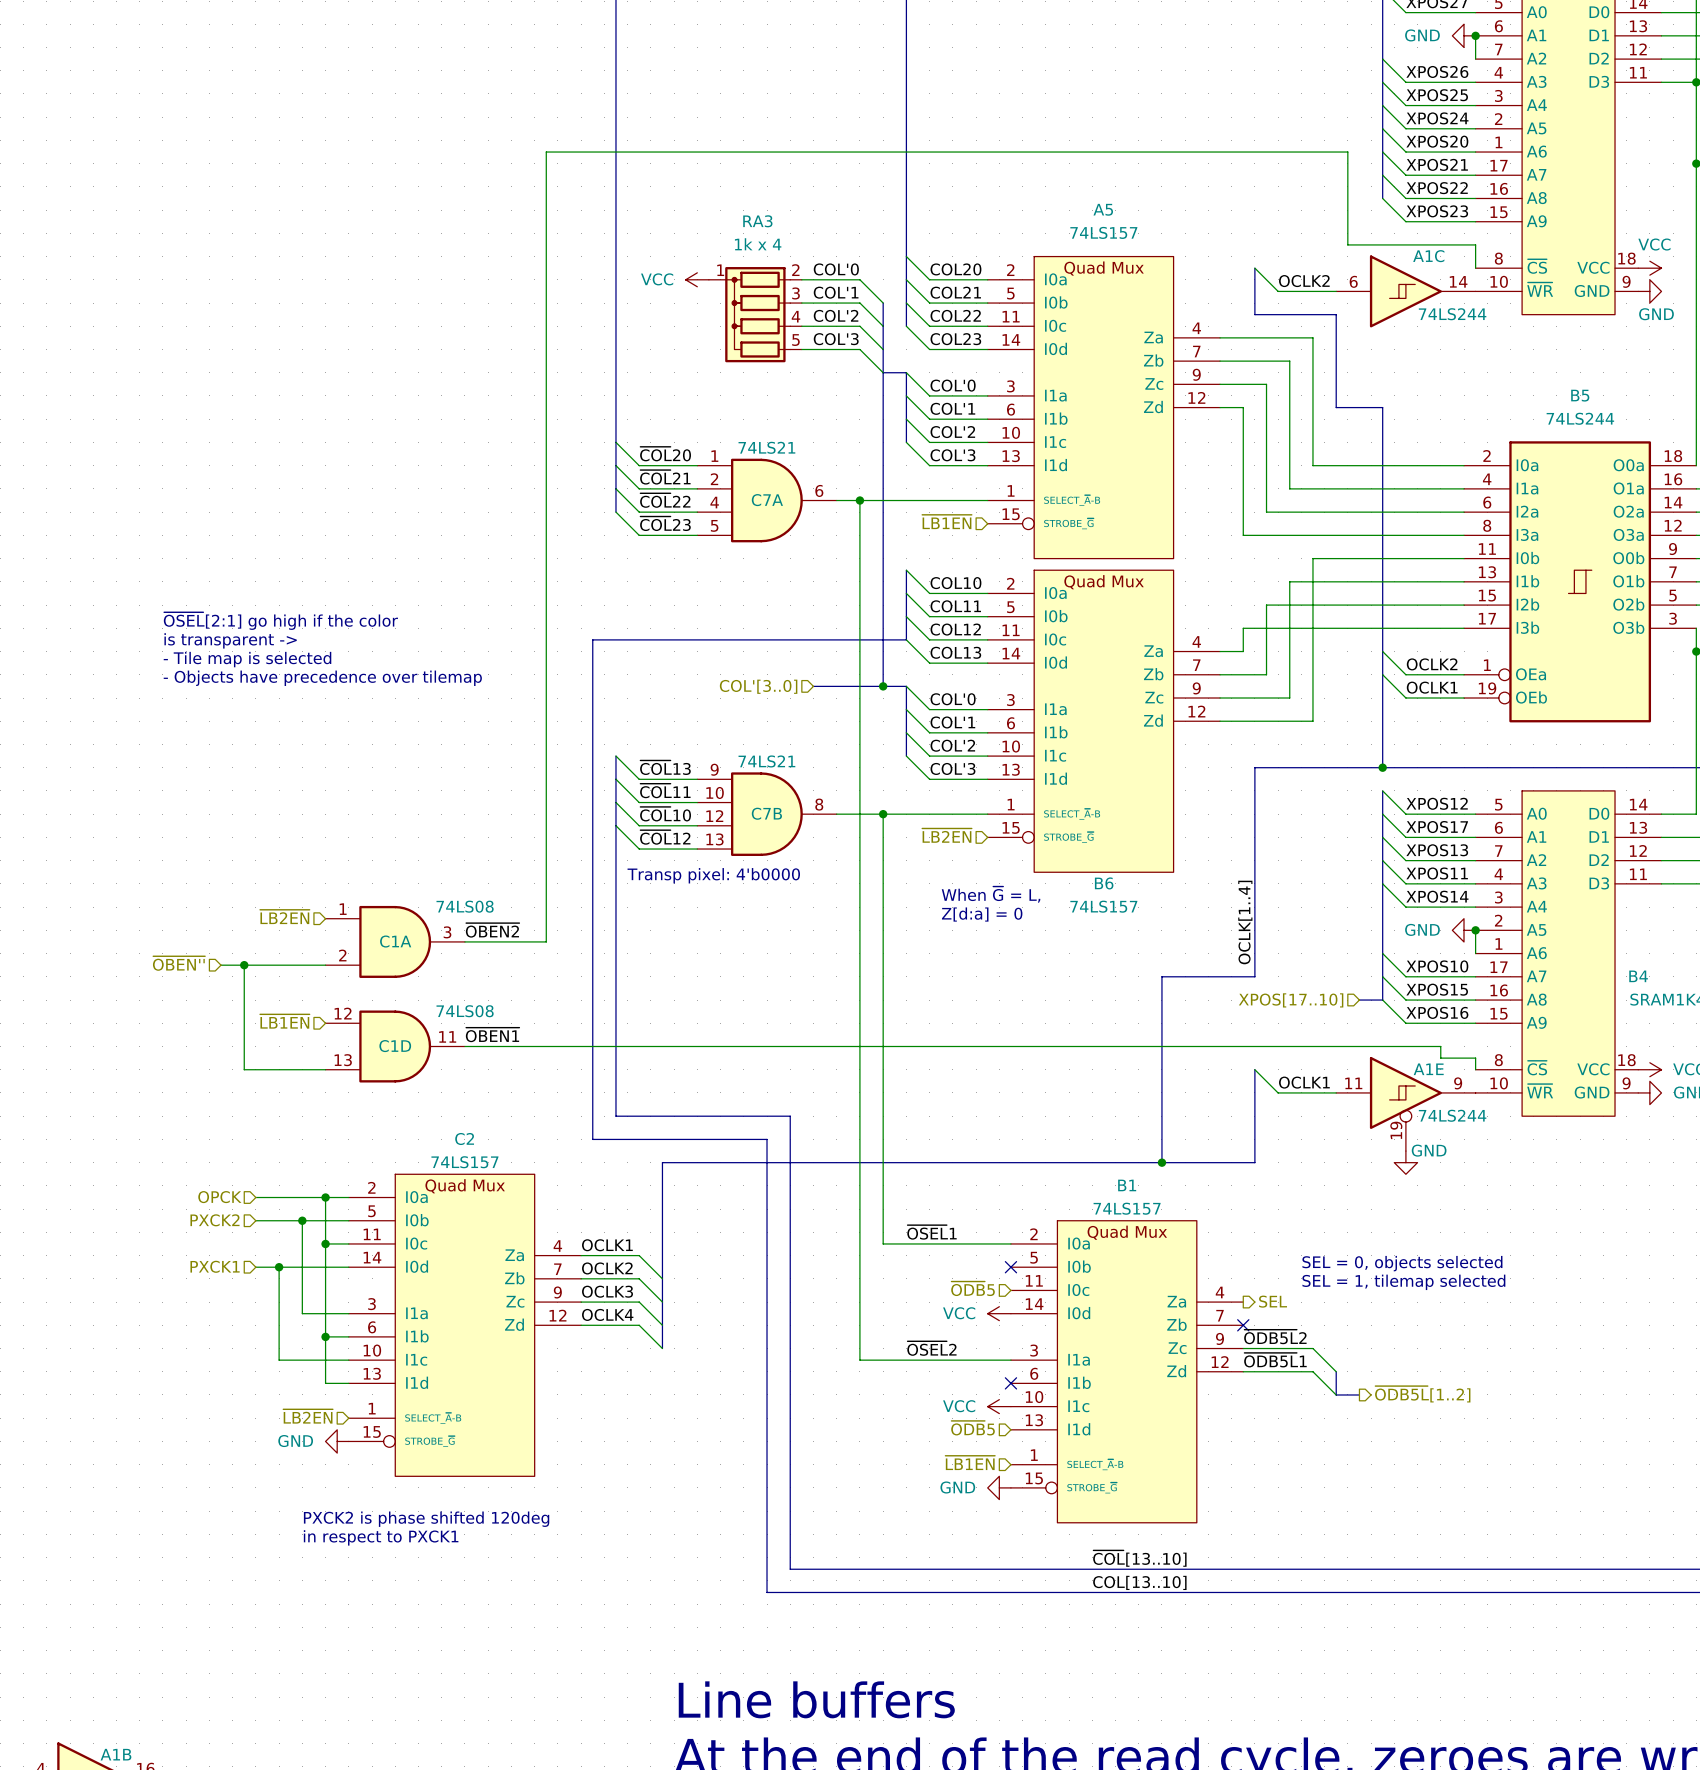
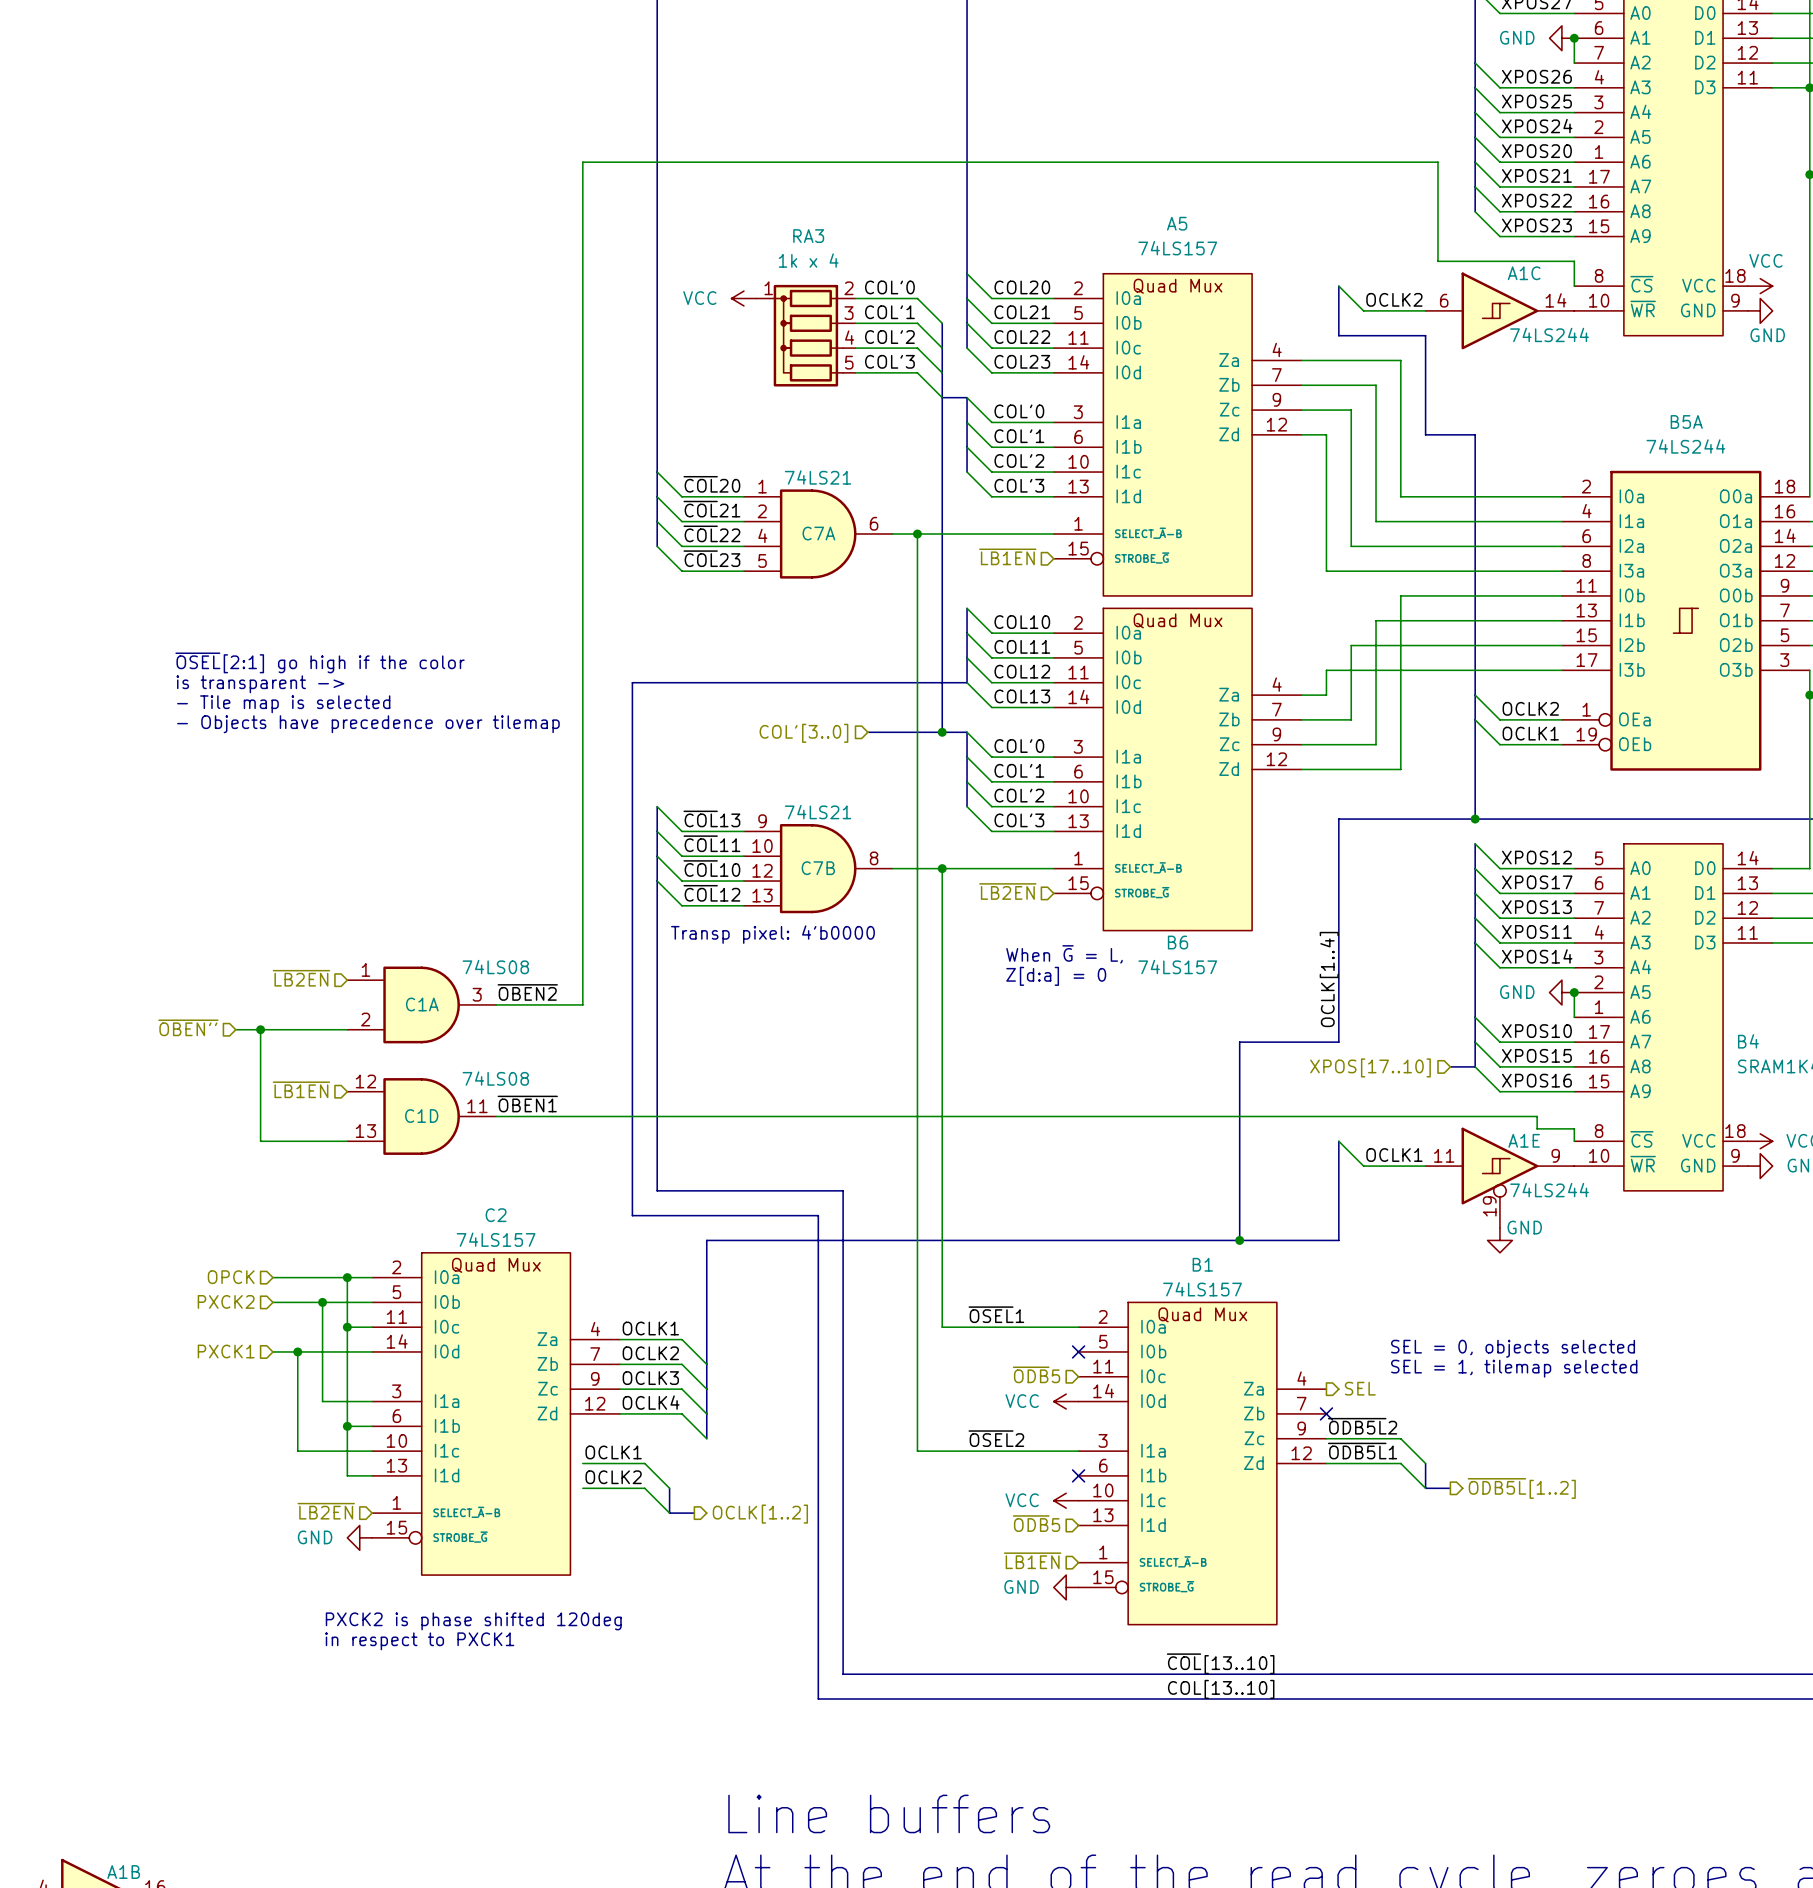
B5 name: B5 (1580, 395) -> B5A (1686, 421)
label: none -> OCLK1 (613, 1452)
wire: none -> (582, 1463) (644, 1463) (669, 1488)
label: none -> OCLK2 (613, 1477)
wire: none -> (582, 1488) (644, 1488) (669, 1513)
bus: none -> (669, 1488) (669, 1513) (694, 1513)
hierarchical label: none -> OCLK[1..2] (760, 1514)

